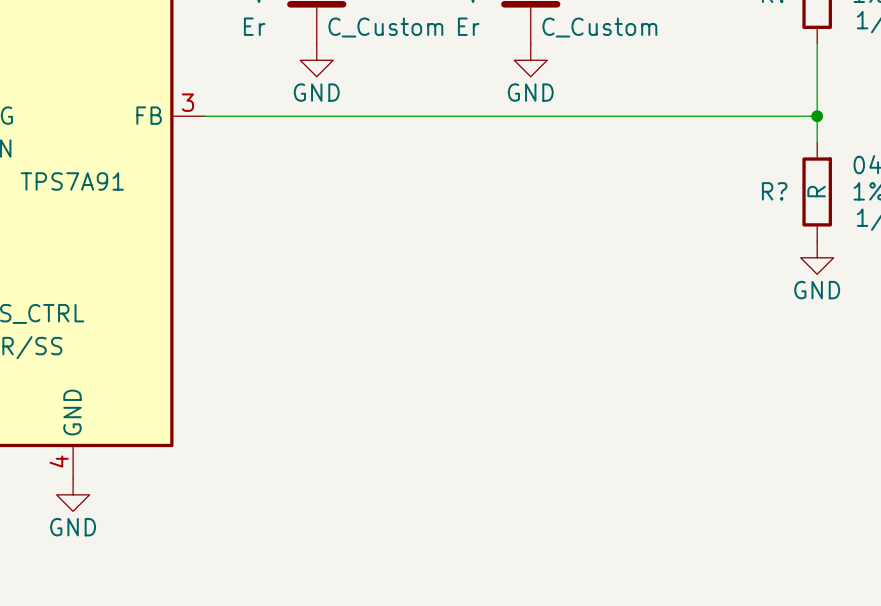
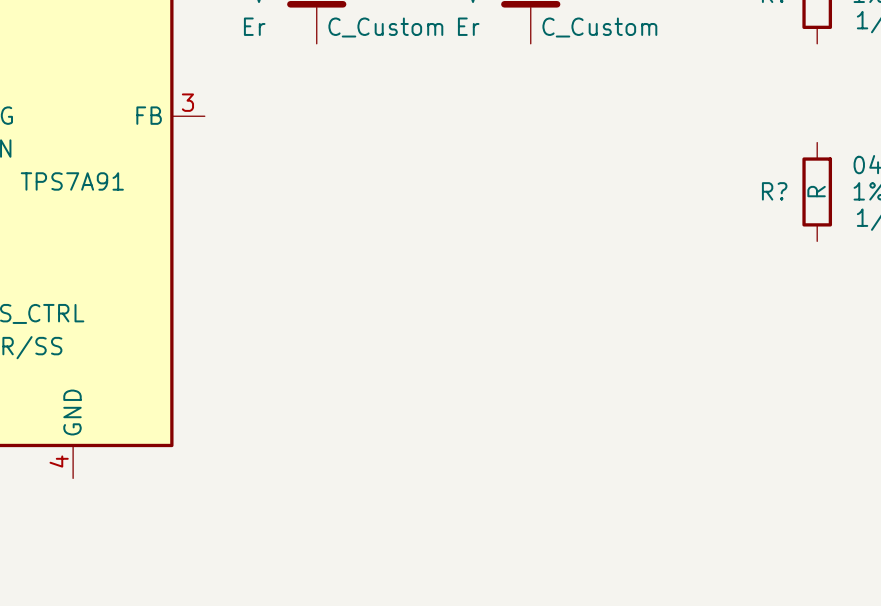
wire: (817, 43) (817, 142) -> none
power symbol: GND (316, 60) -> none
power symbol: GND (530, 60) -> none
wire: (204, 116) (817, 116) -> none
junction: (817, 116) -> none
power symbol: GND (817, 257) -> none
power symbol: GND (73, 494) -> none

